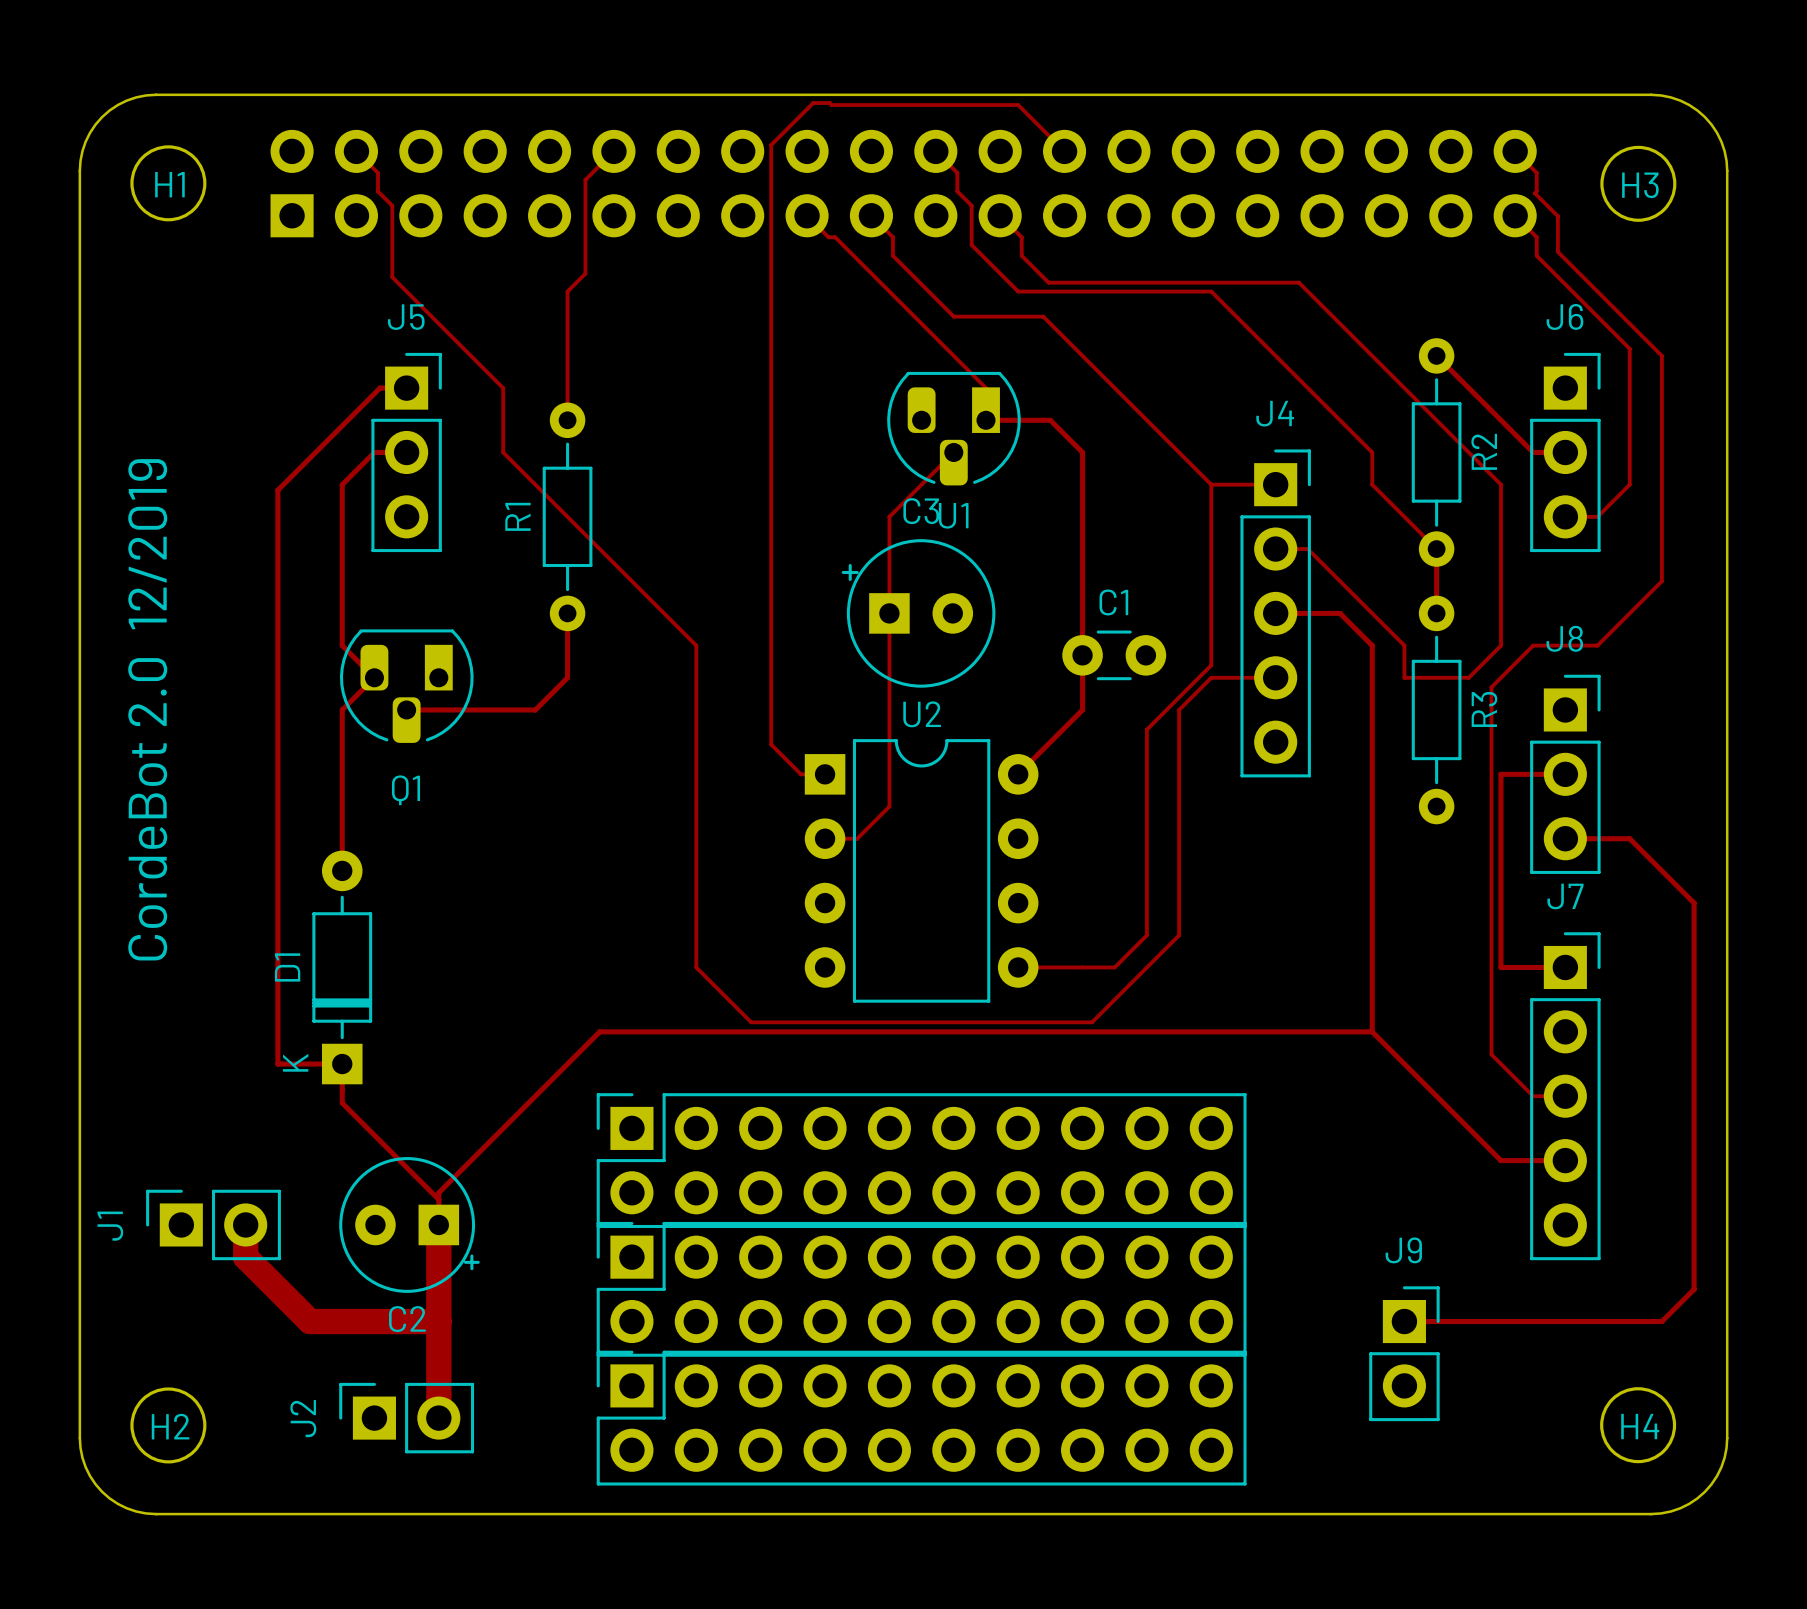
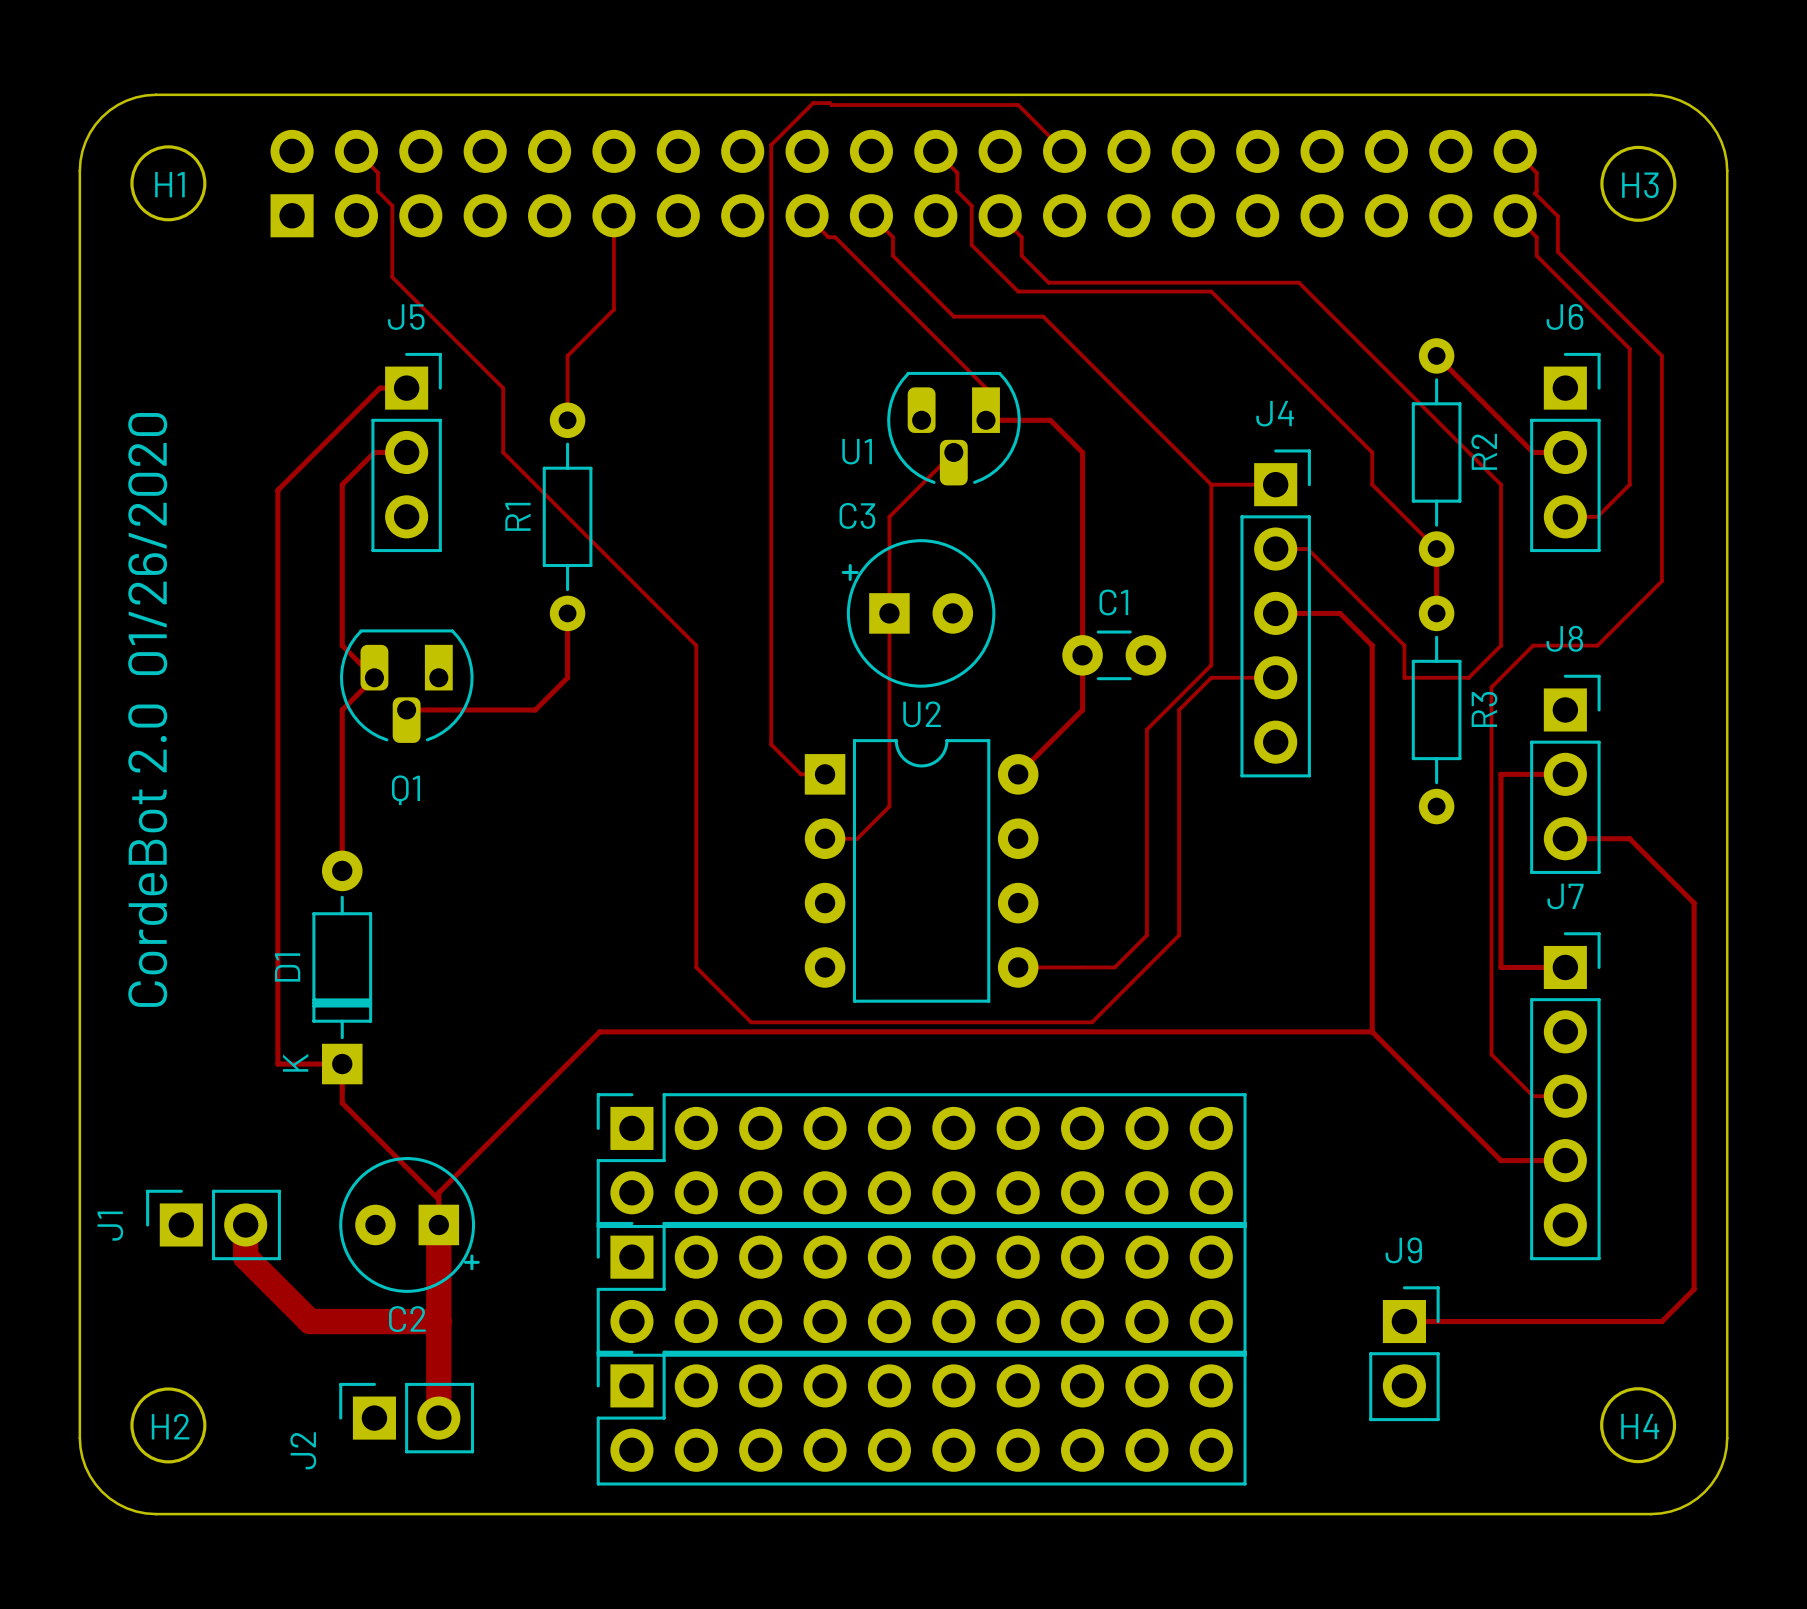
track: (613, 151) (585, 179) (585, 273) (567, 291) (567, 355) -> (613, 215) (613, 309) (567, 355)
C3 name position: C3 (921, 511) -> C3 (857, 515)
U1 name position: U1 (953, 515) -> U1 (857, 451)
text: CordeBot 2.0 12/2019 (147, 709) -> CordeBot 2.0 01/26/2020 (147, 709)
J2 name position: J2 (303, 1418) -> J2 (303, 1450)

